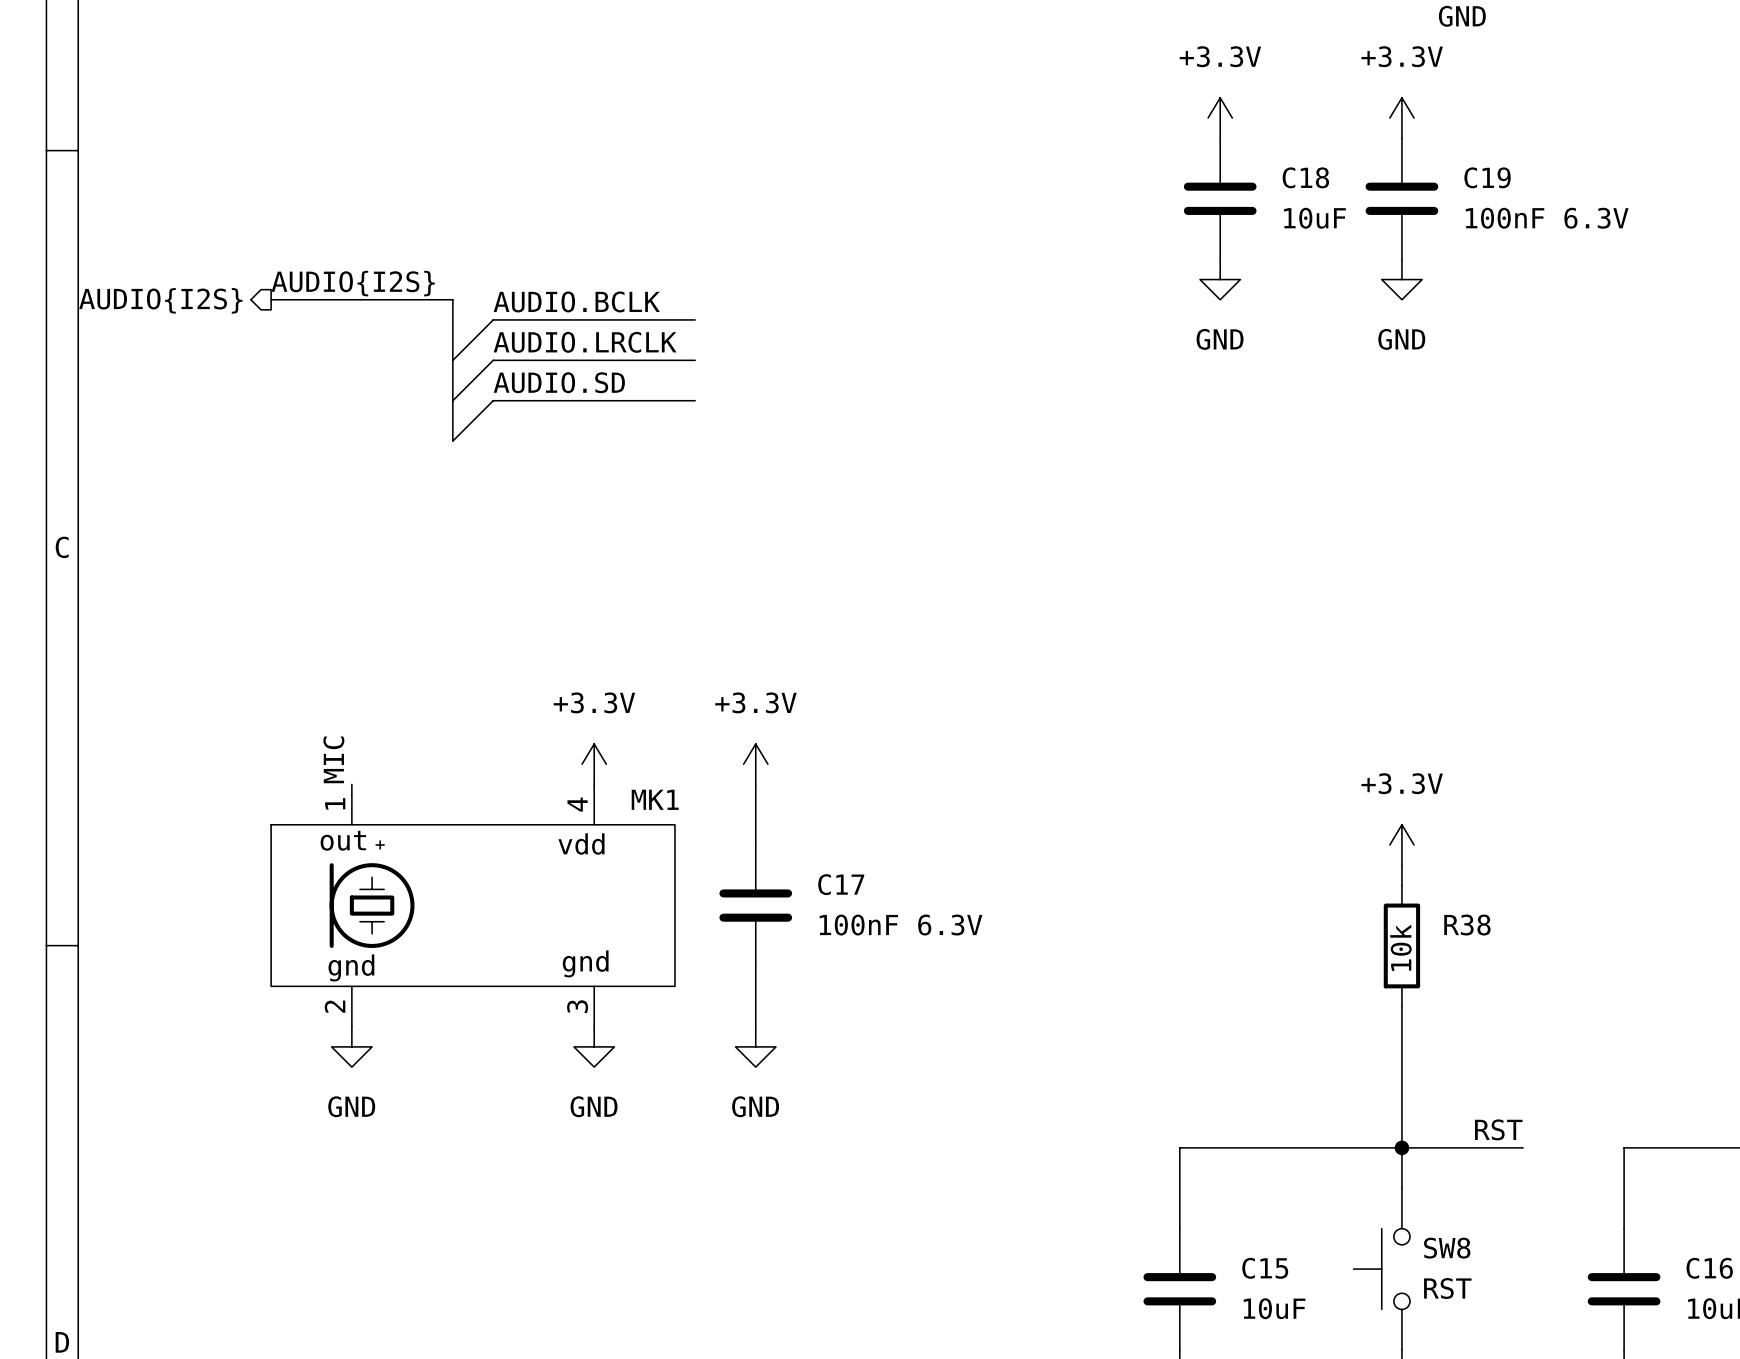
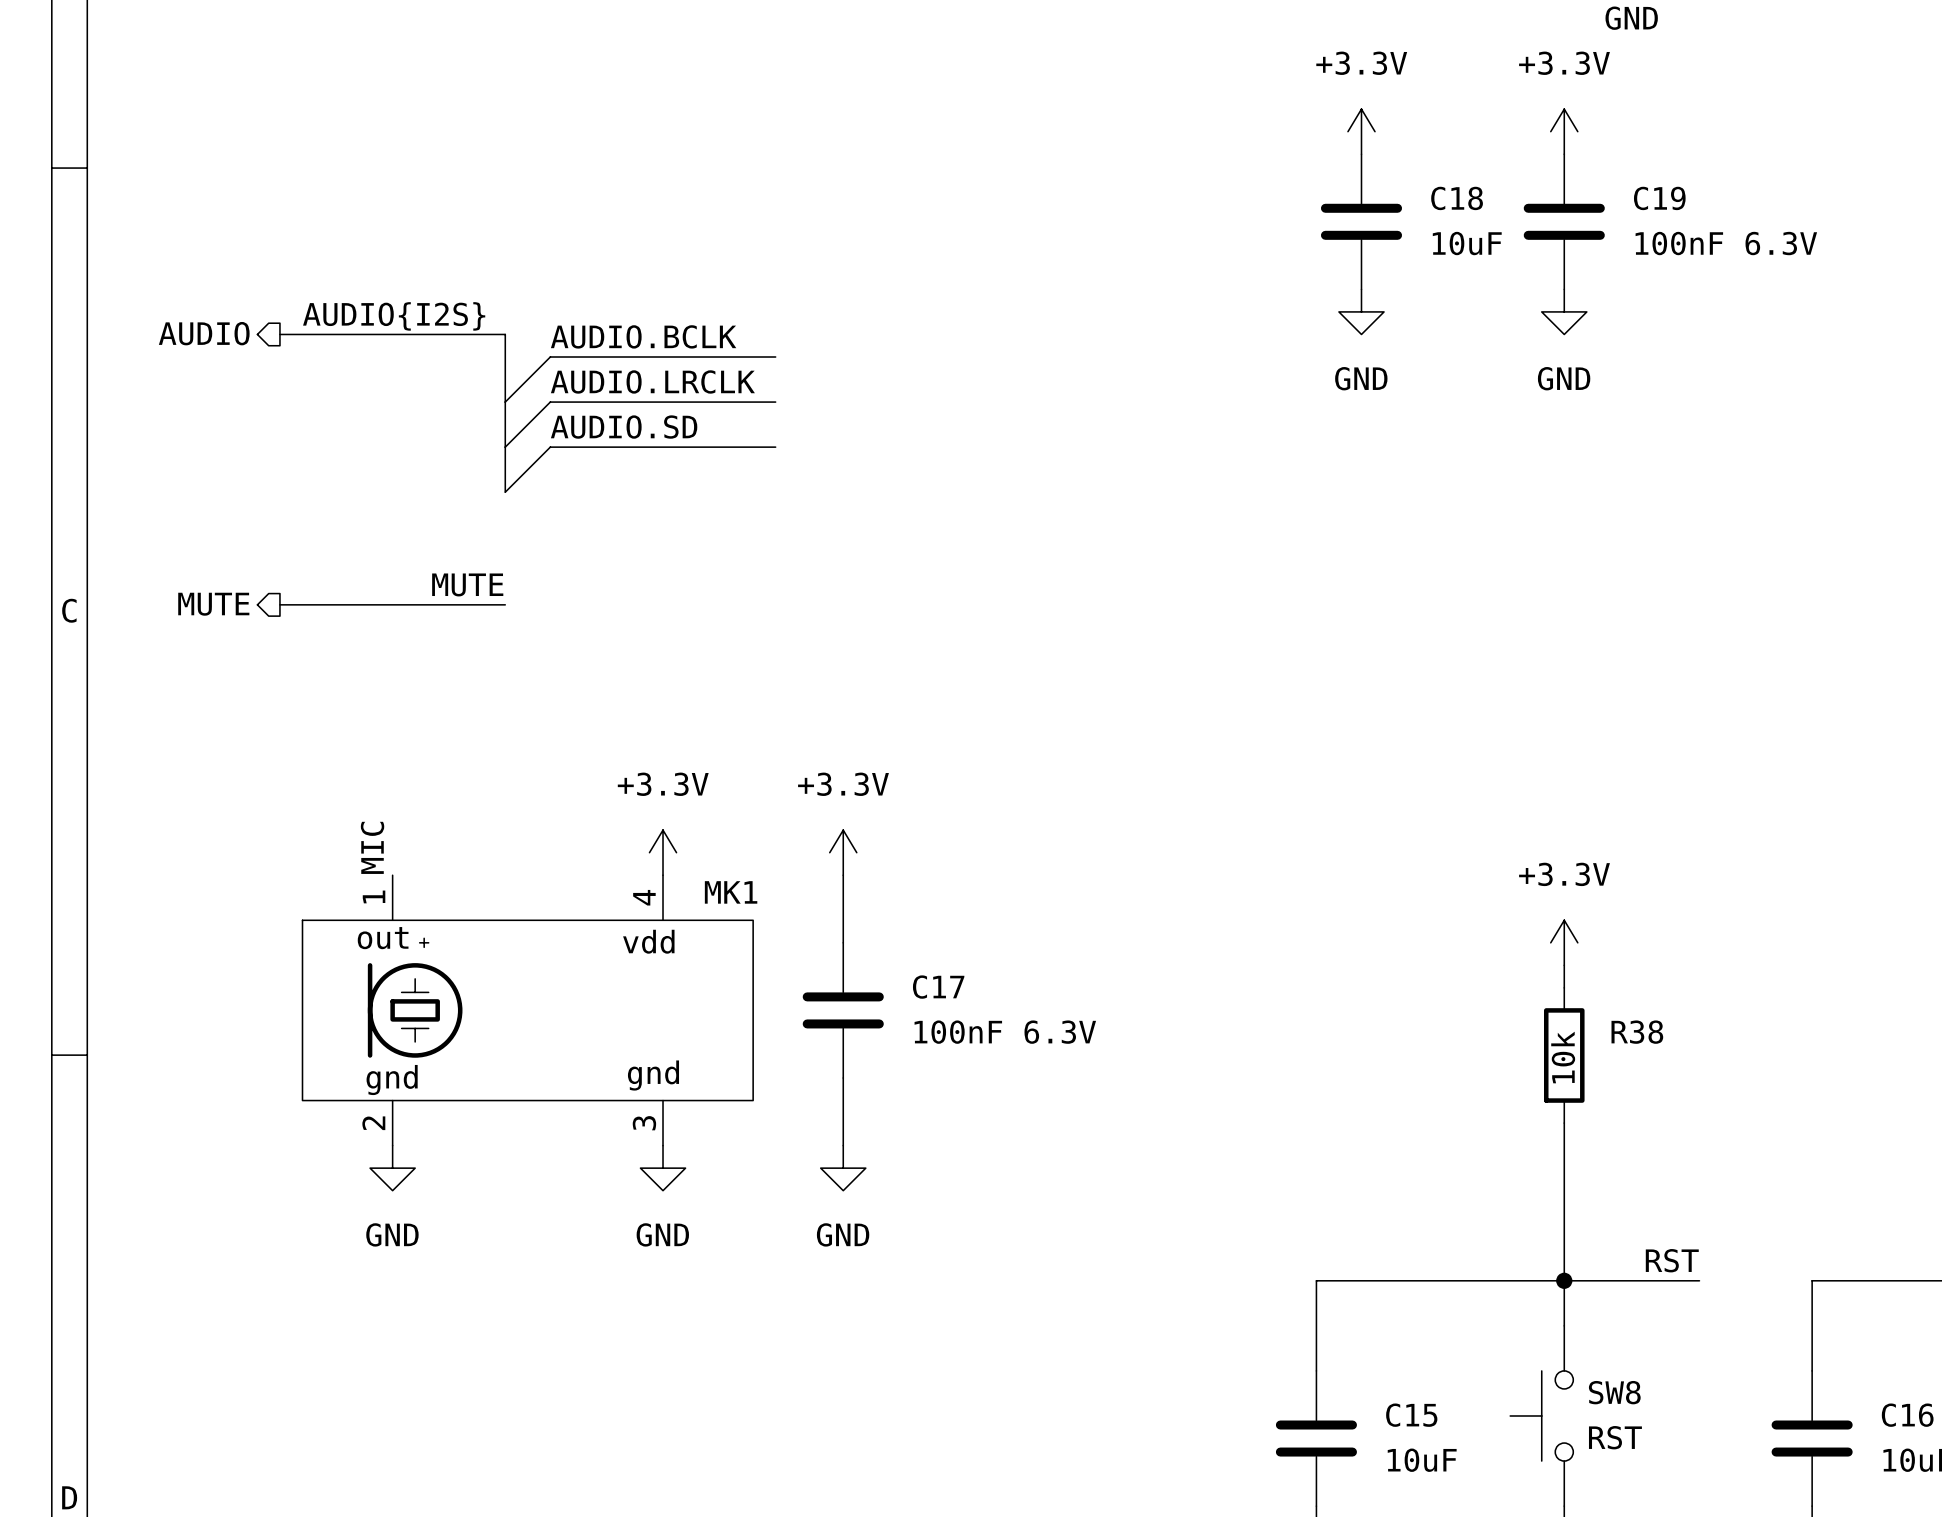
bus: none -> (279, 334) (302, 334)
hierarchical label: AUDIO{I2S} (160, 300) -> AUDIO (204, 333)
label: none -> MUTE (467, 584)
hierarchical label: none -> MUTE (213, 604)
wire: none -> (279, 604) (505, 604)

